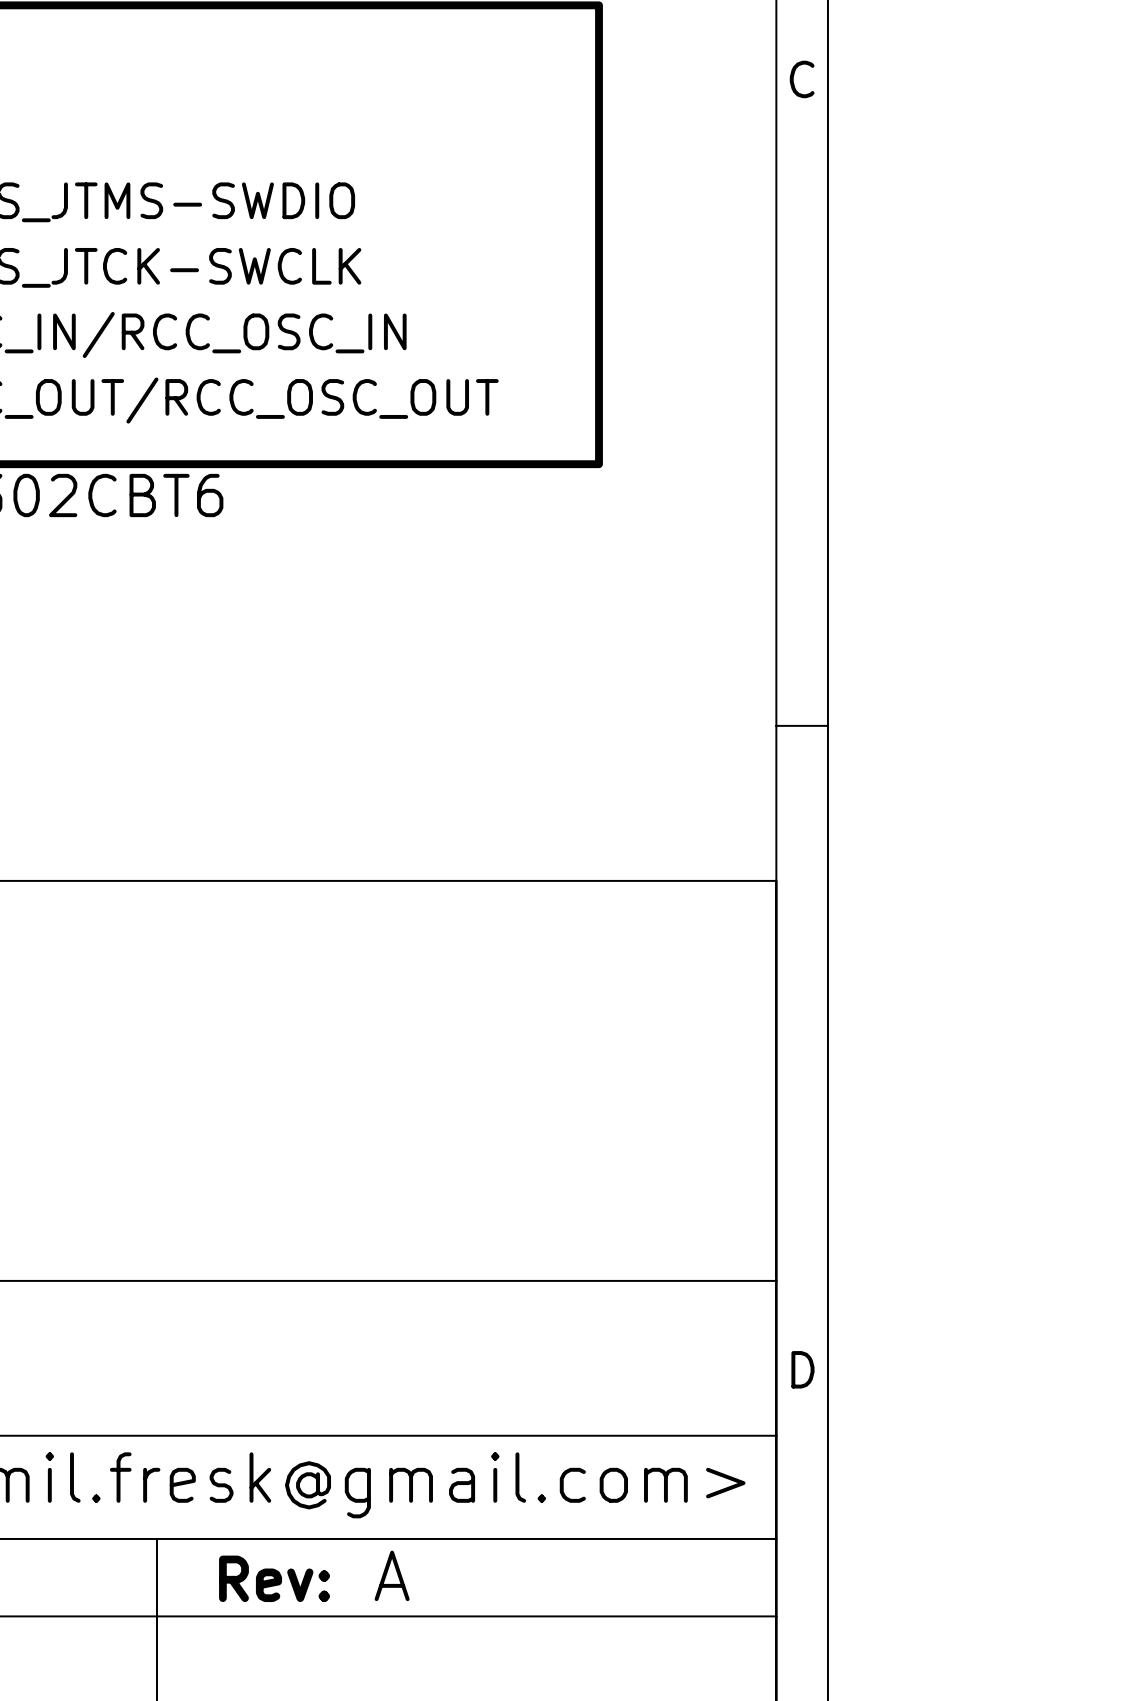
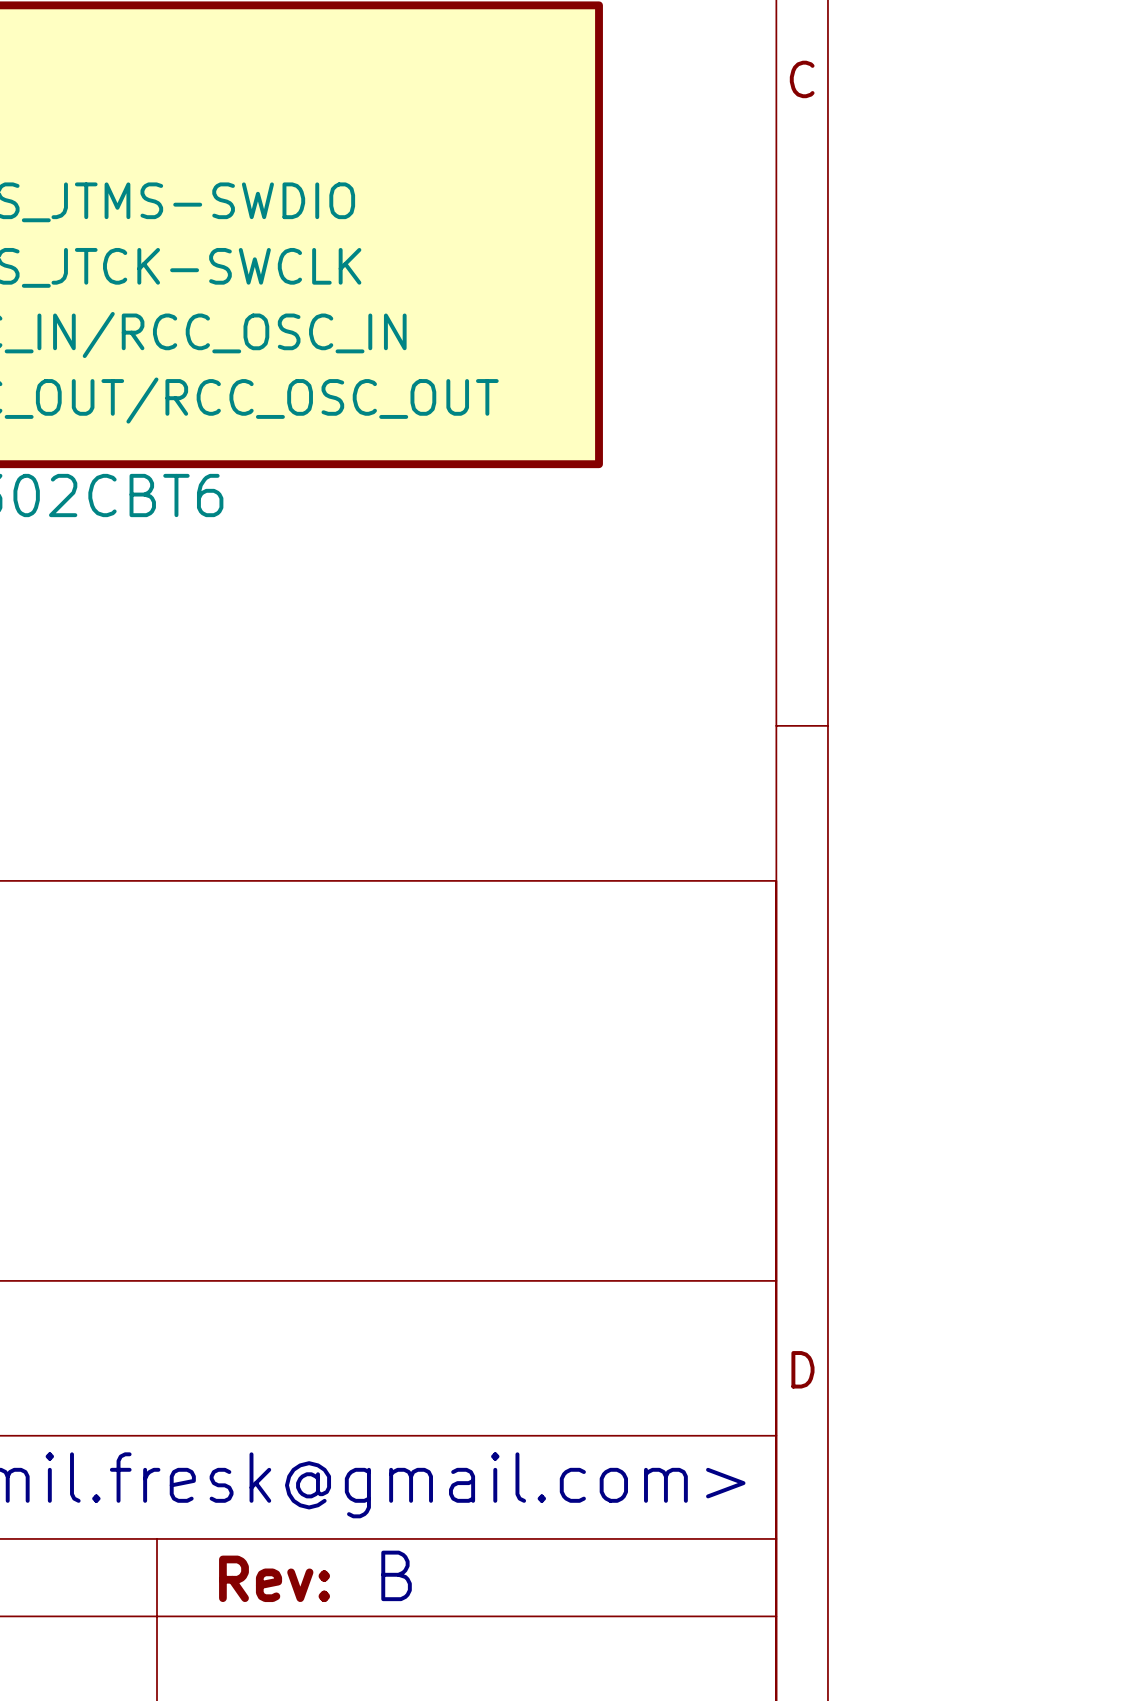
text: A (392, 1575) -> B (396, 1575)

